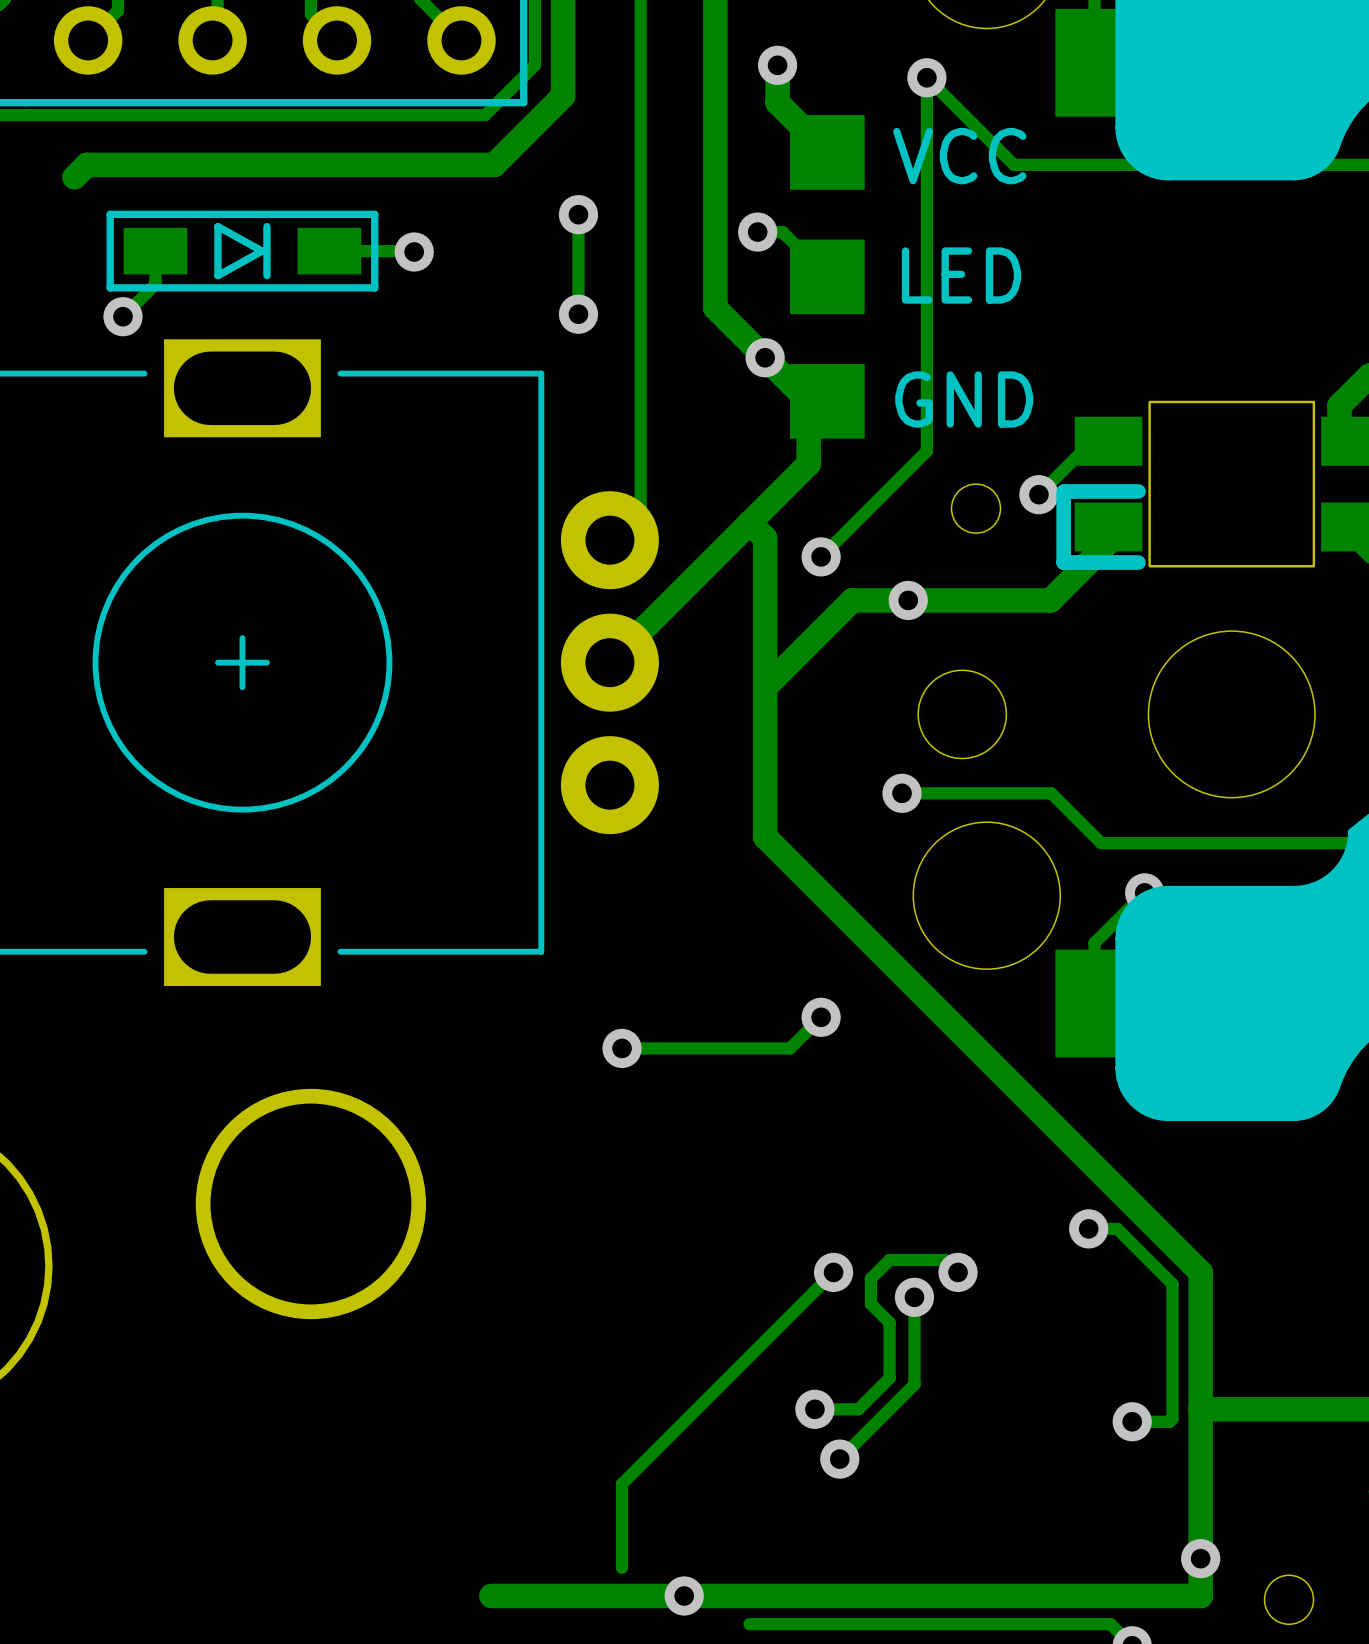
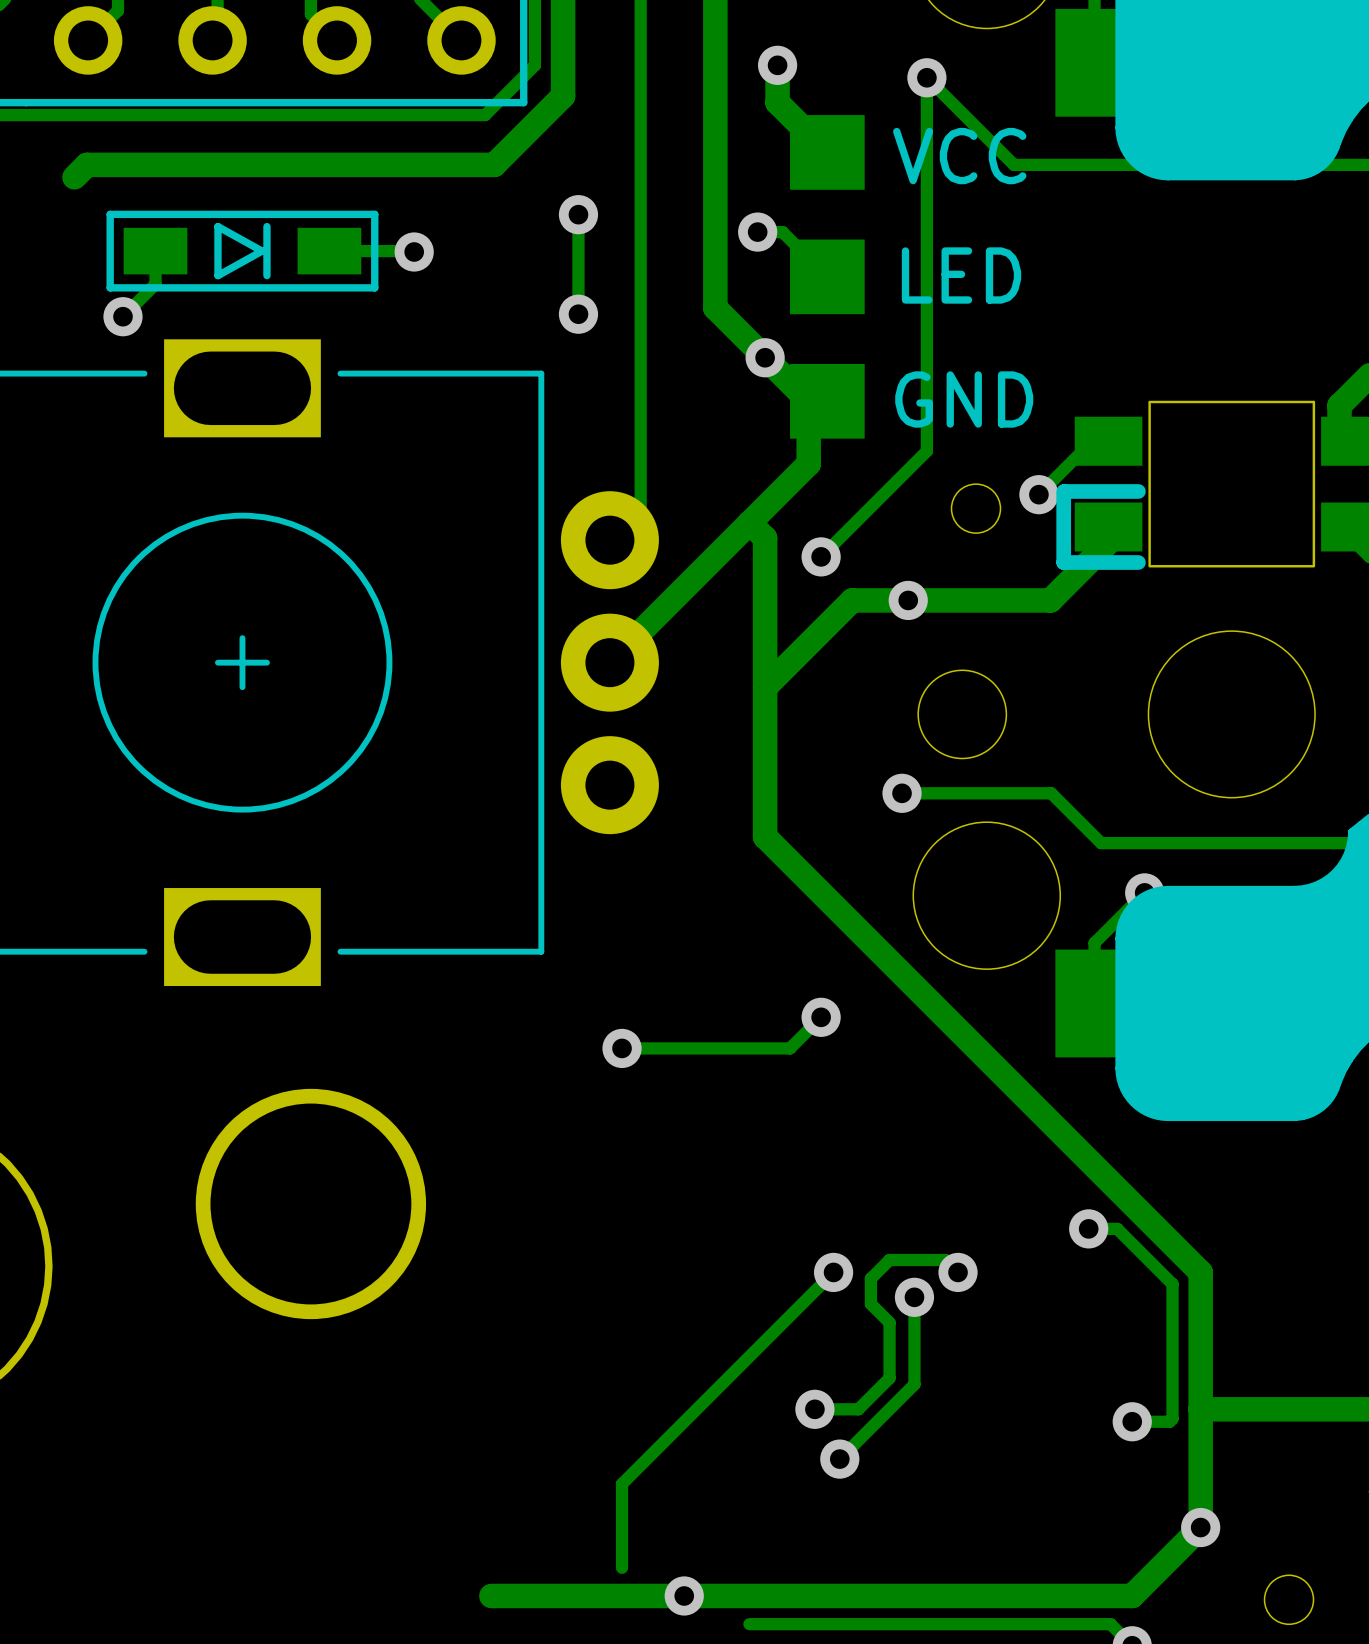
track: (1200, 1527) (1200, 1595) (1132, 1595) -> (1200, 1527) (1132, 1595)
via position: (1200, 1558) -> (1200, 1527)

